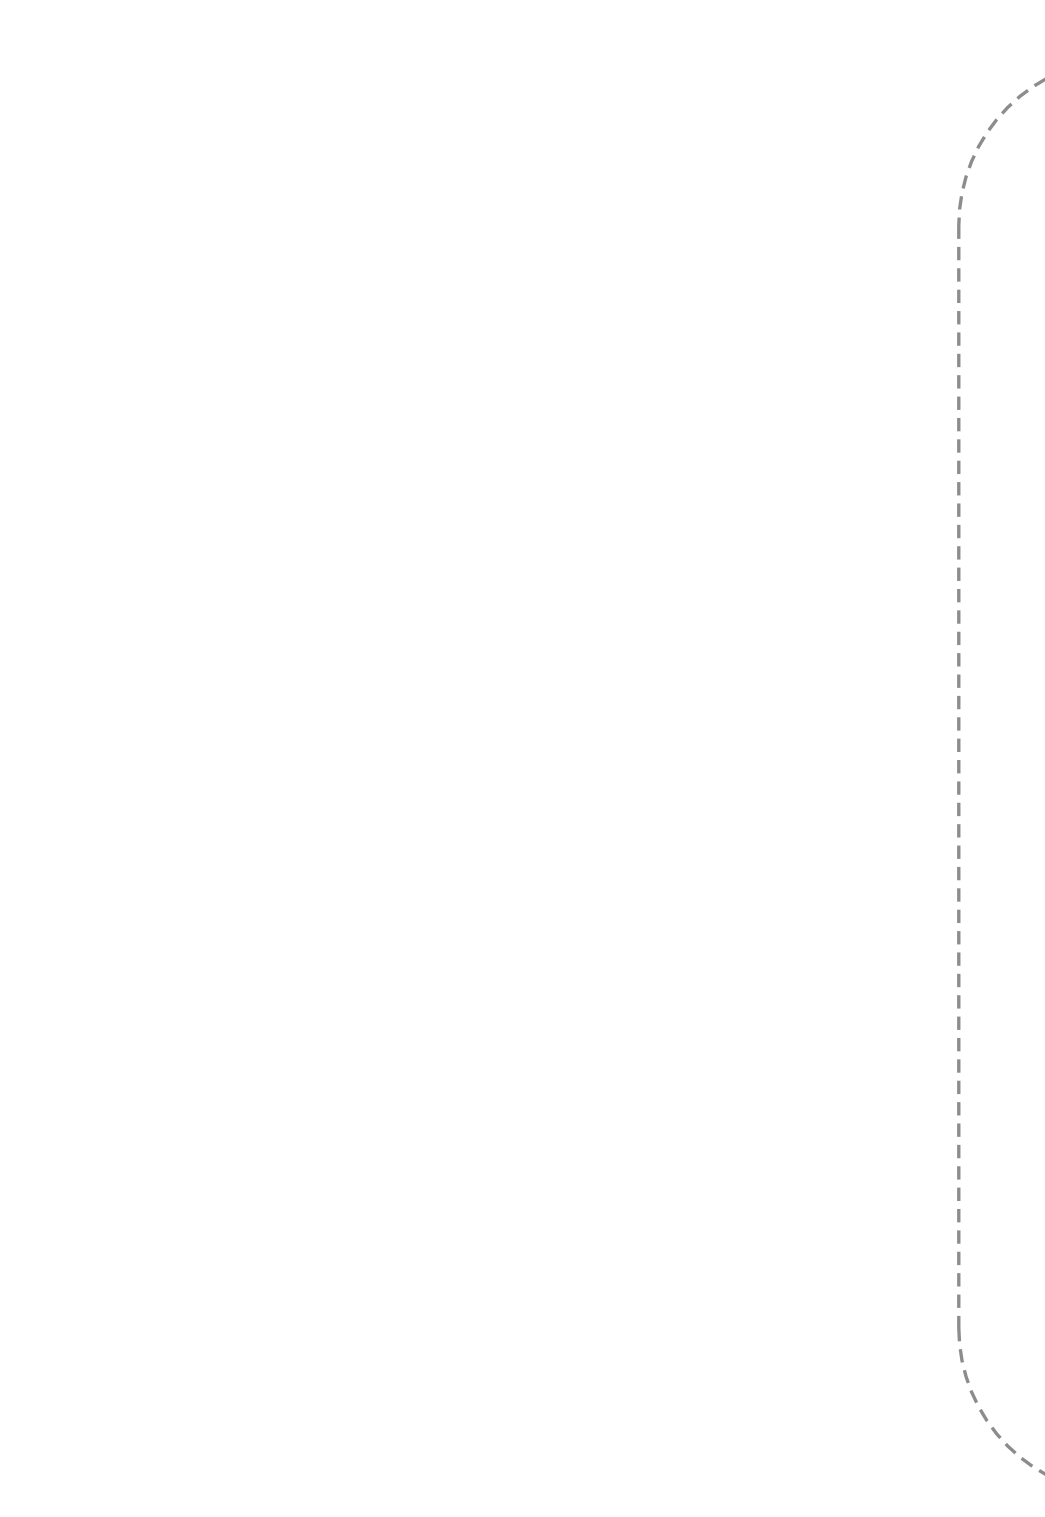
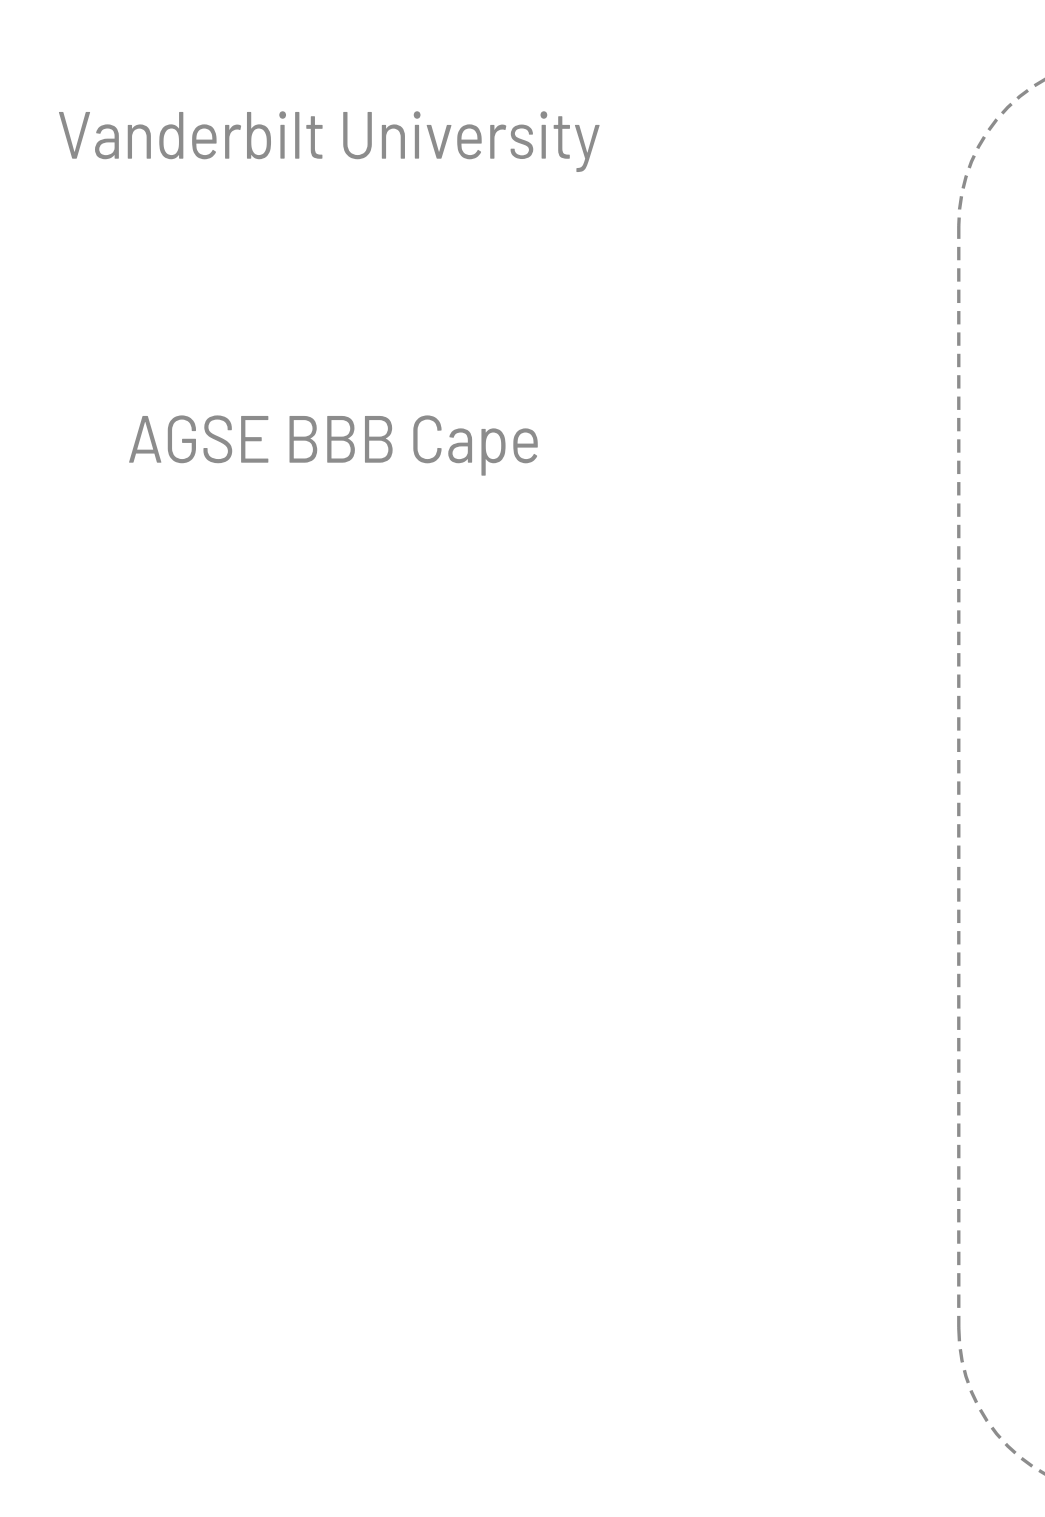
text: none -> Vanderbilt University (329, 141)
text: none -> AGSE BBB Cape (333, 445)

